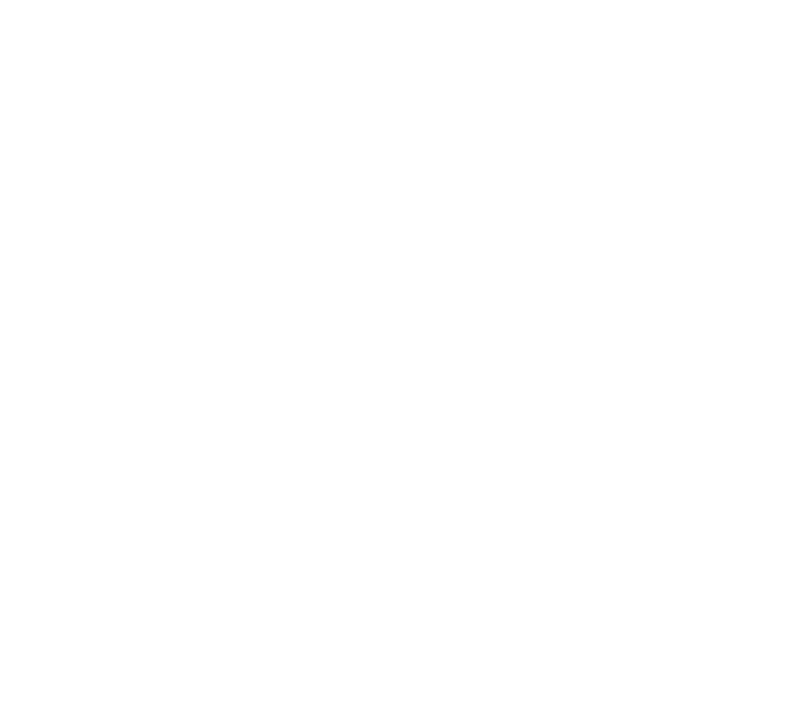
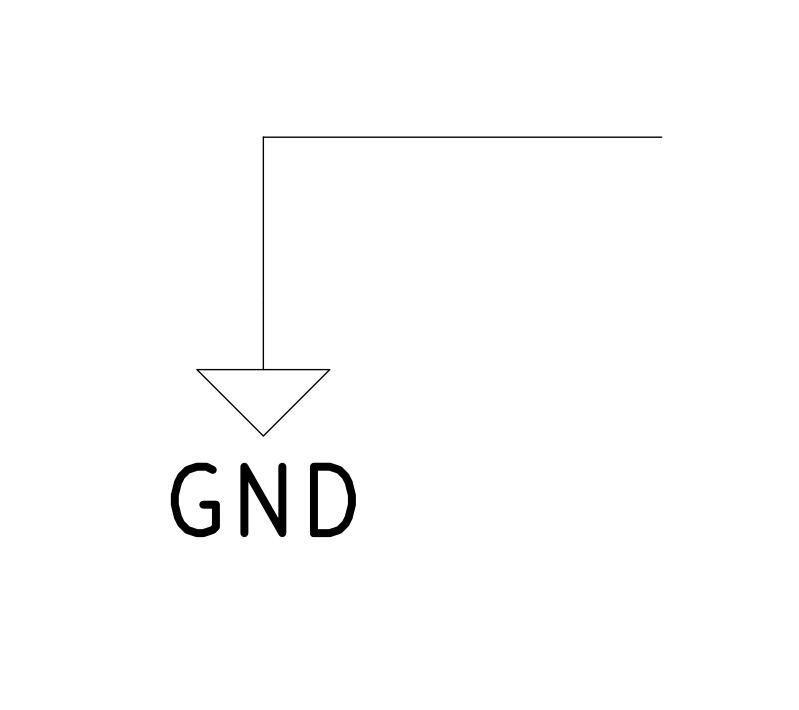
wire: none -> (661, 137) (263, 137) (263, 303)
power symbol: none -> GND (263, 369)

